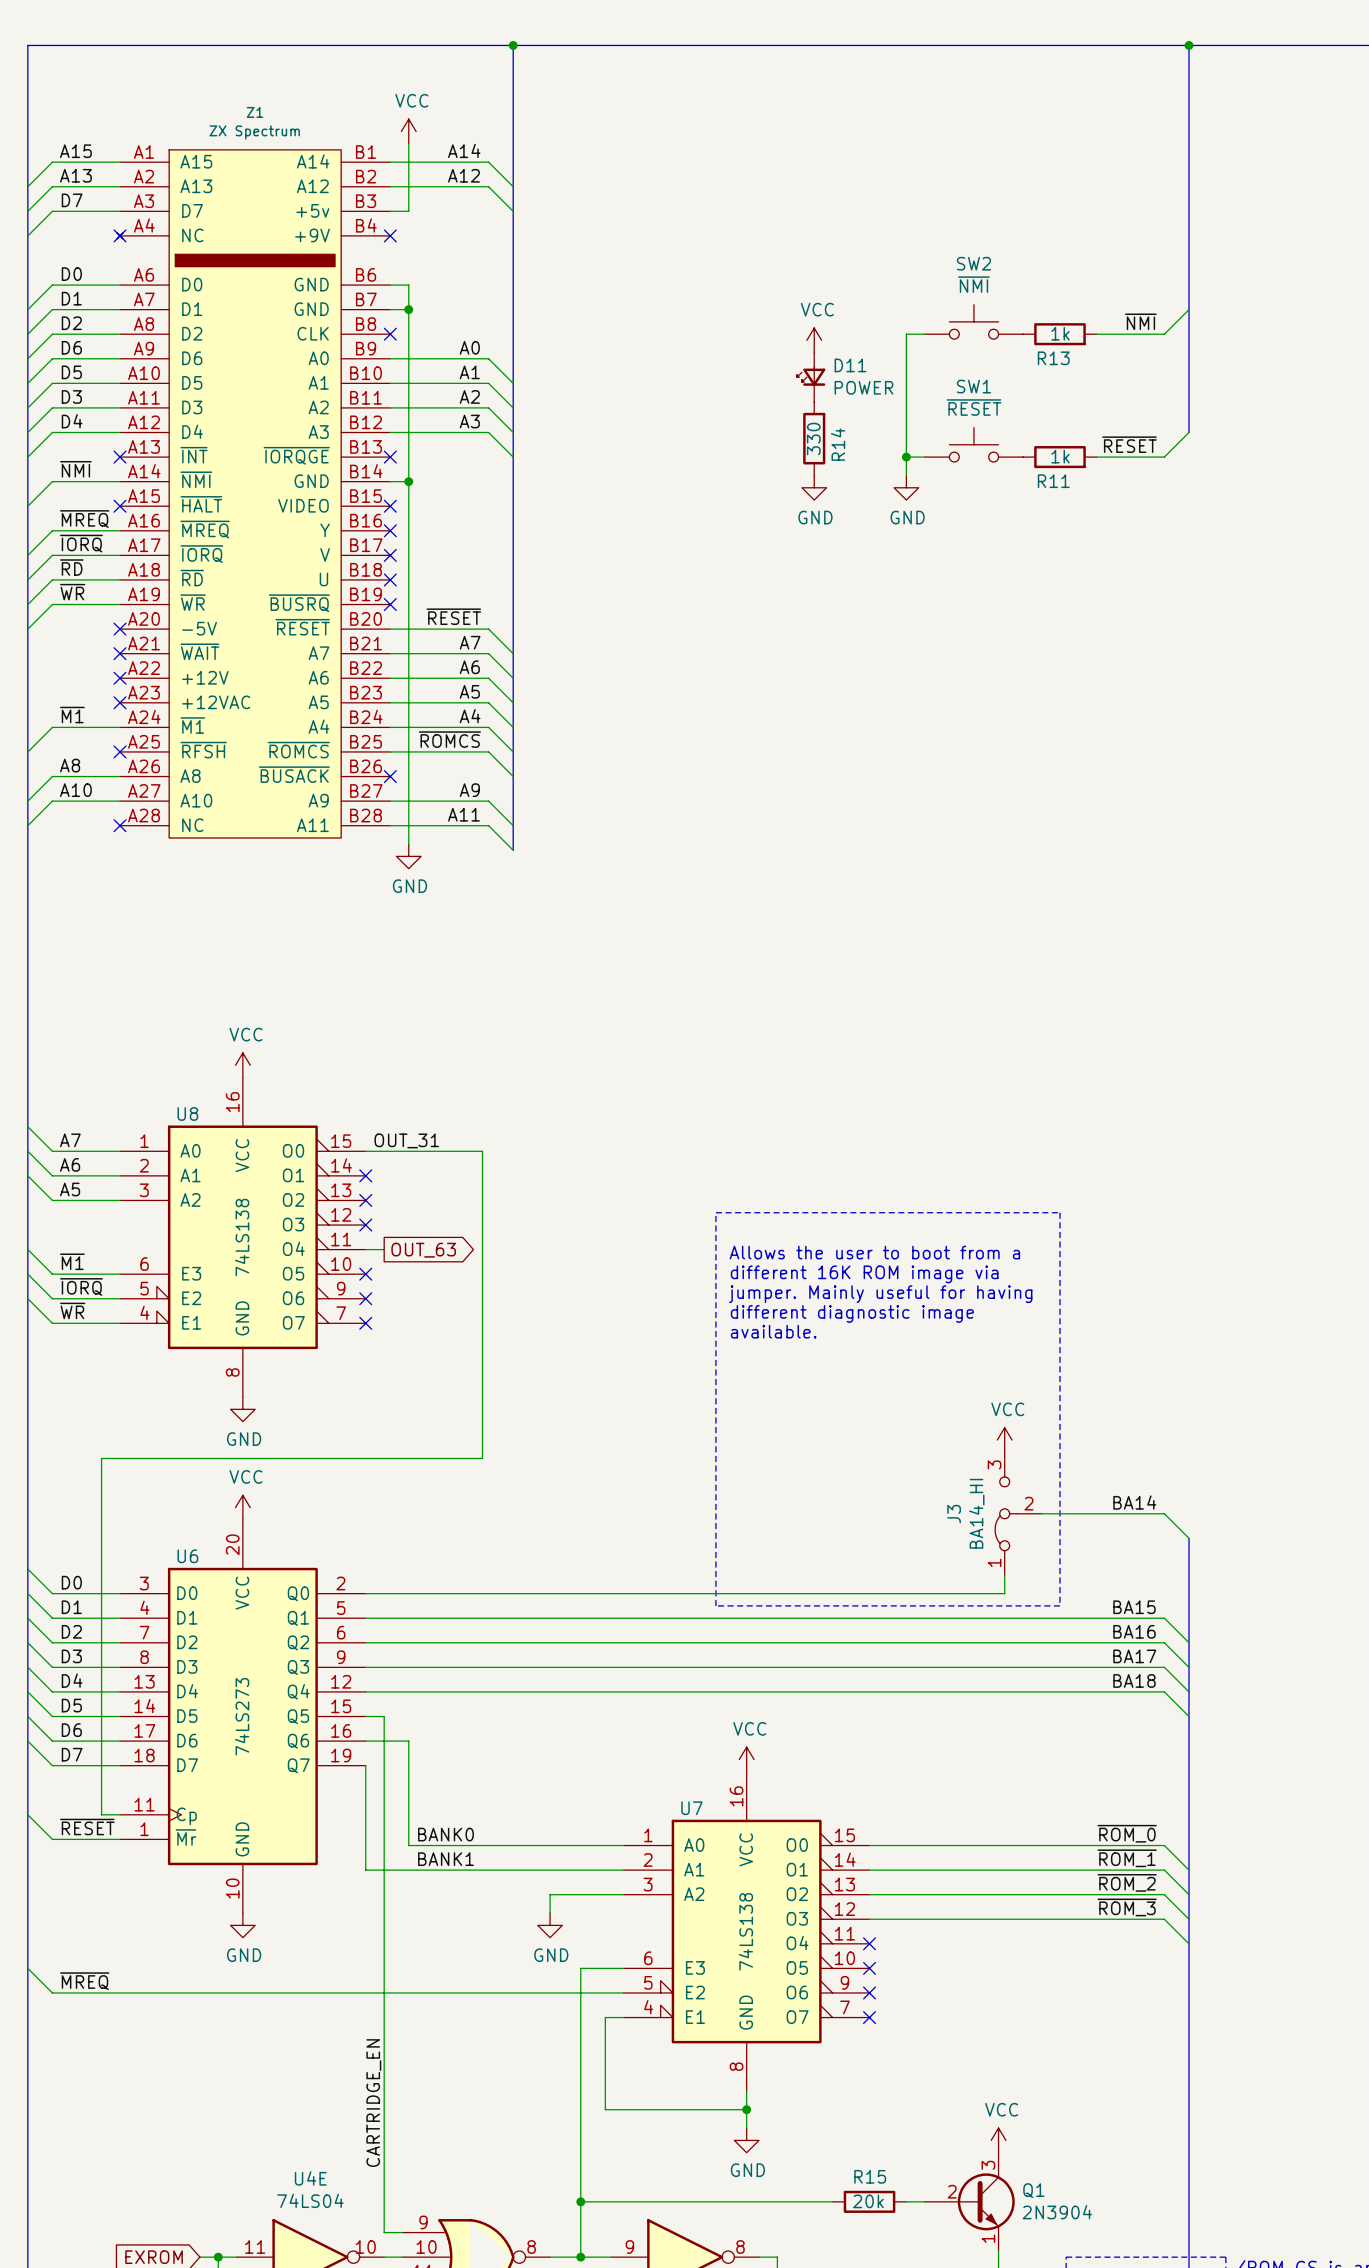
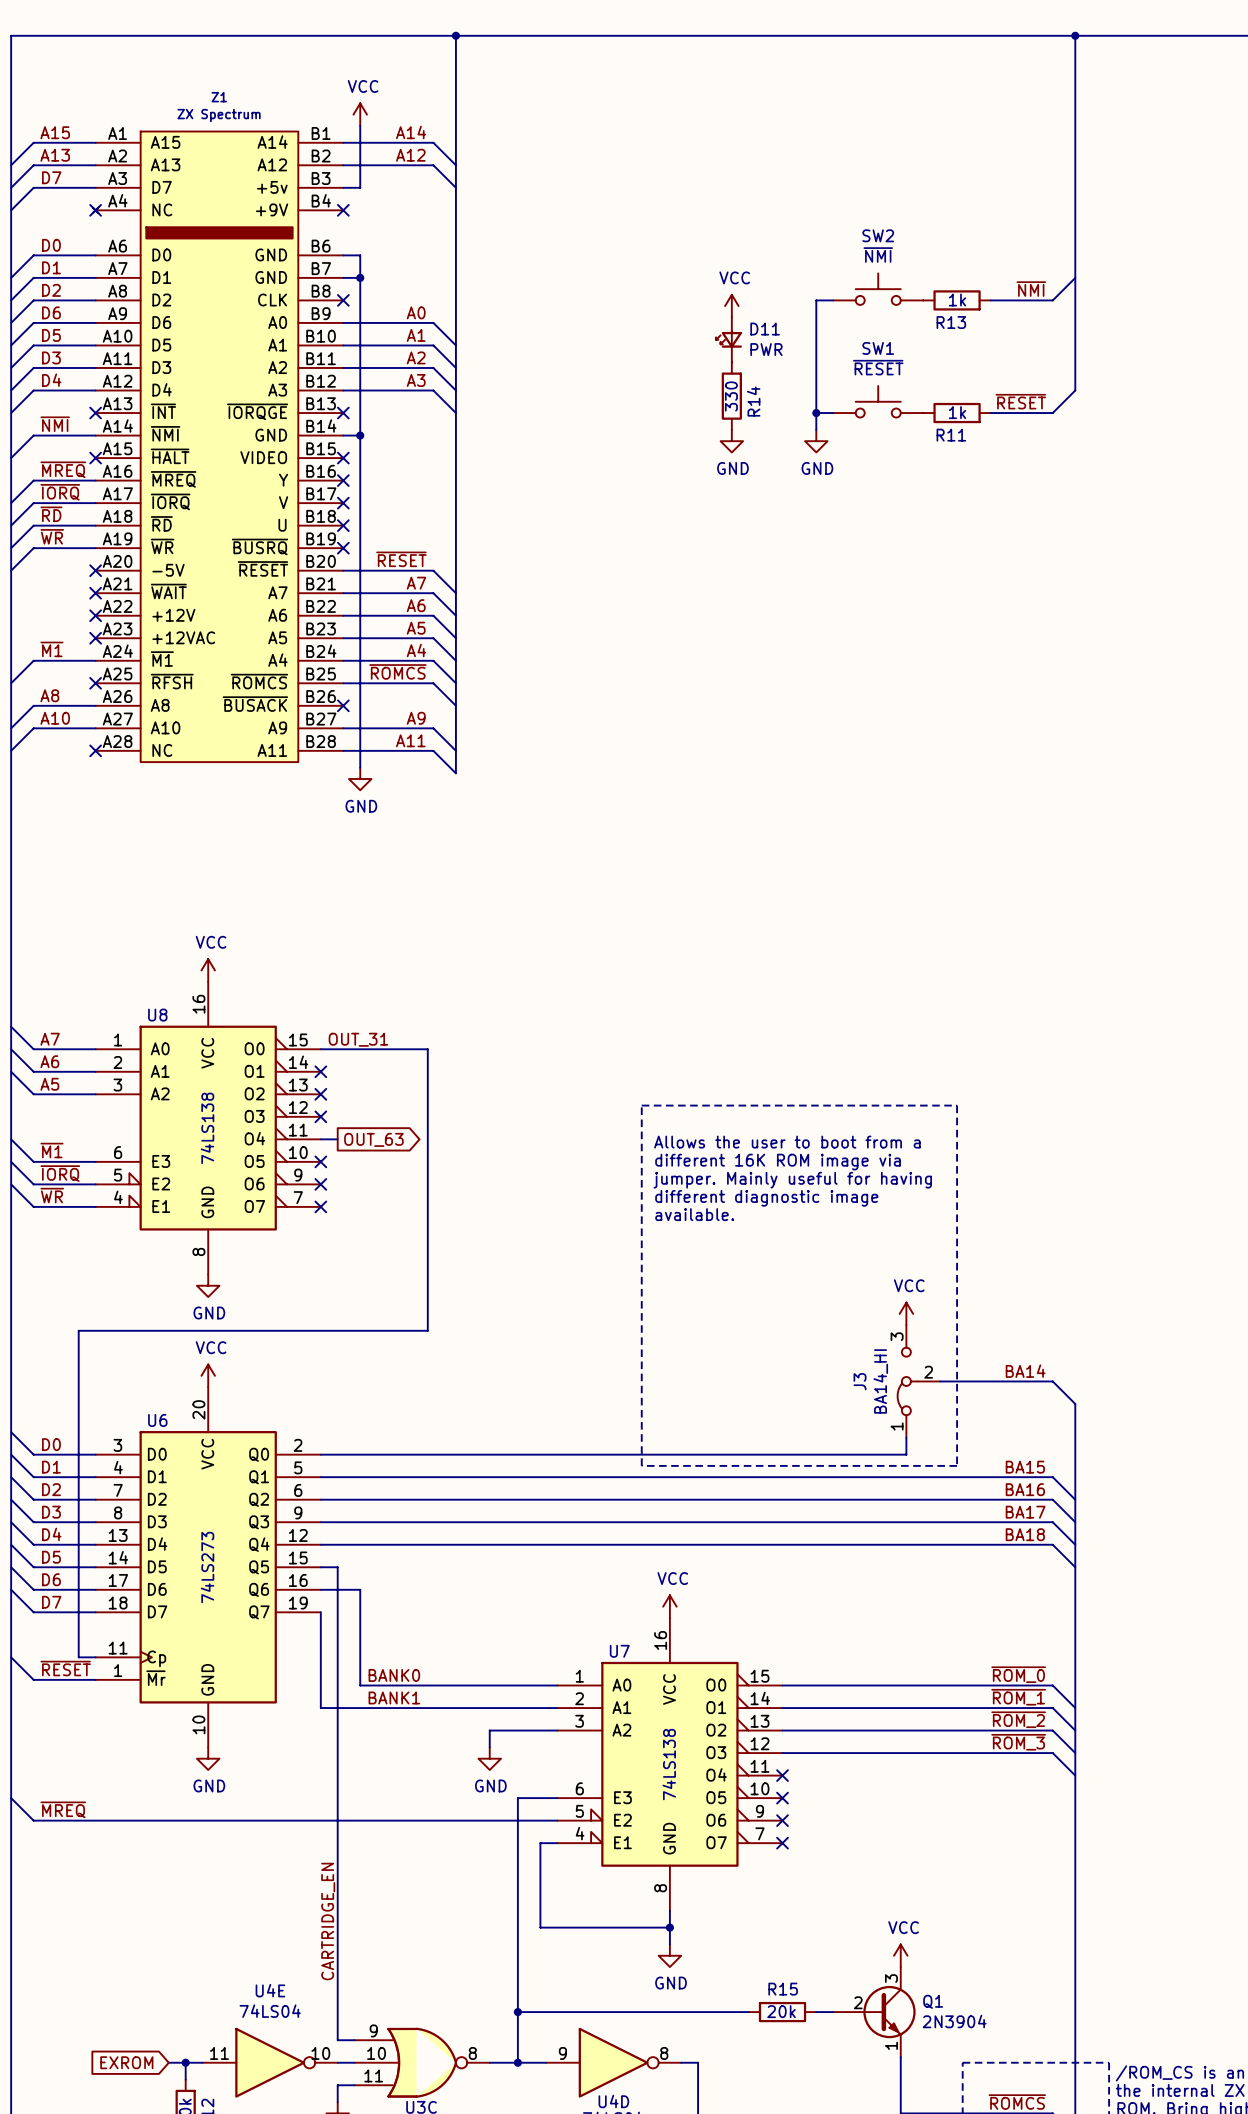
D11 value: POWER (864, 387) -> PWR (766, 349)

